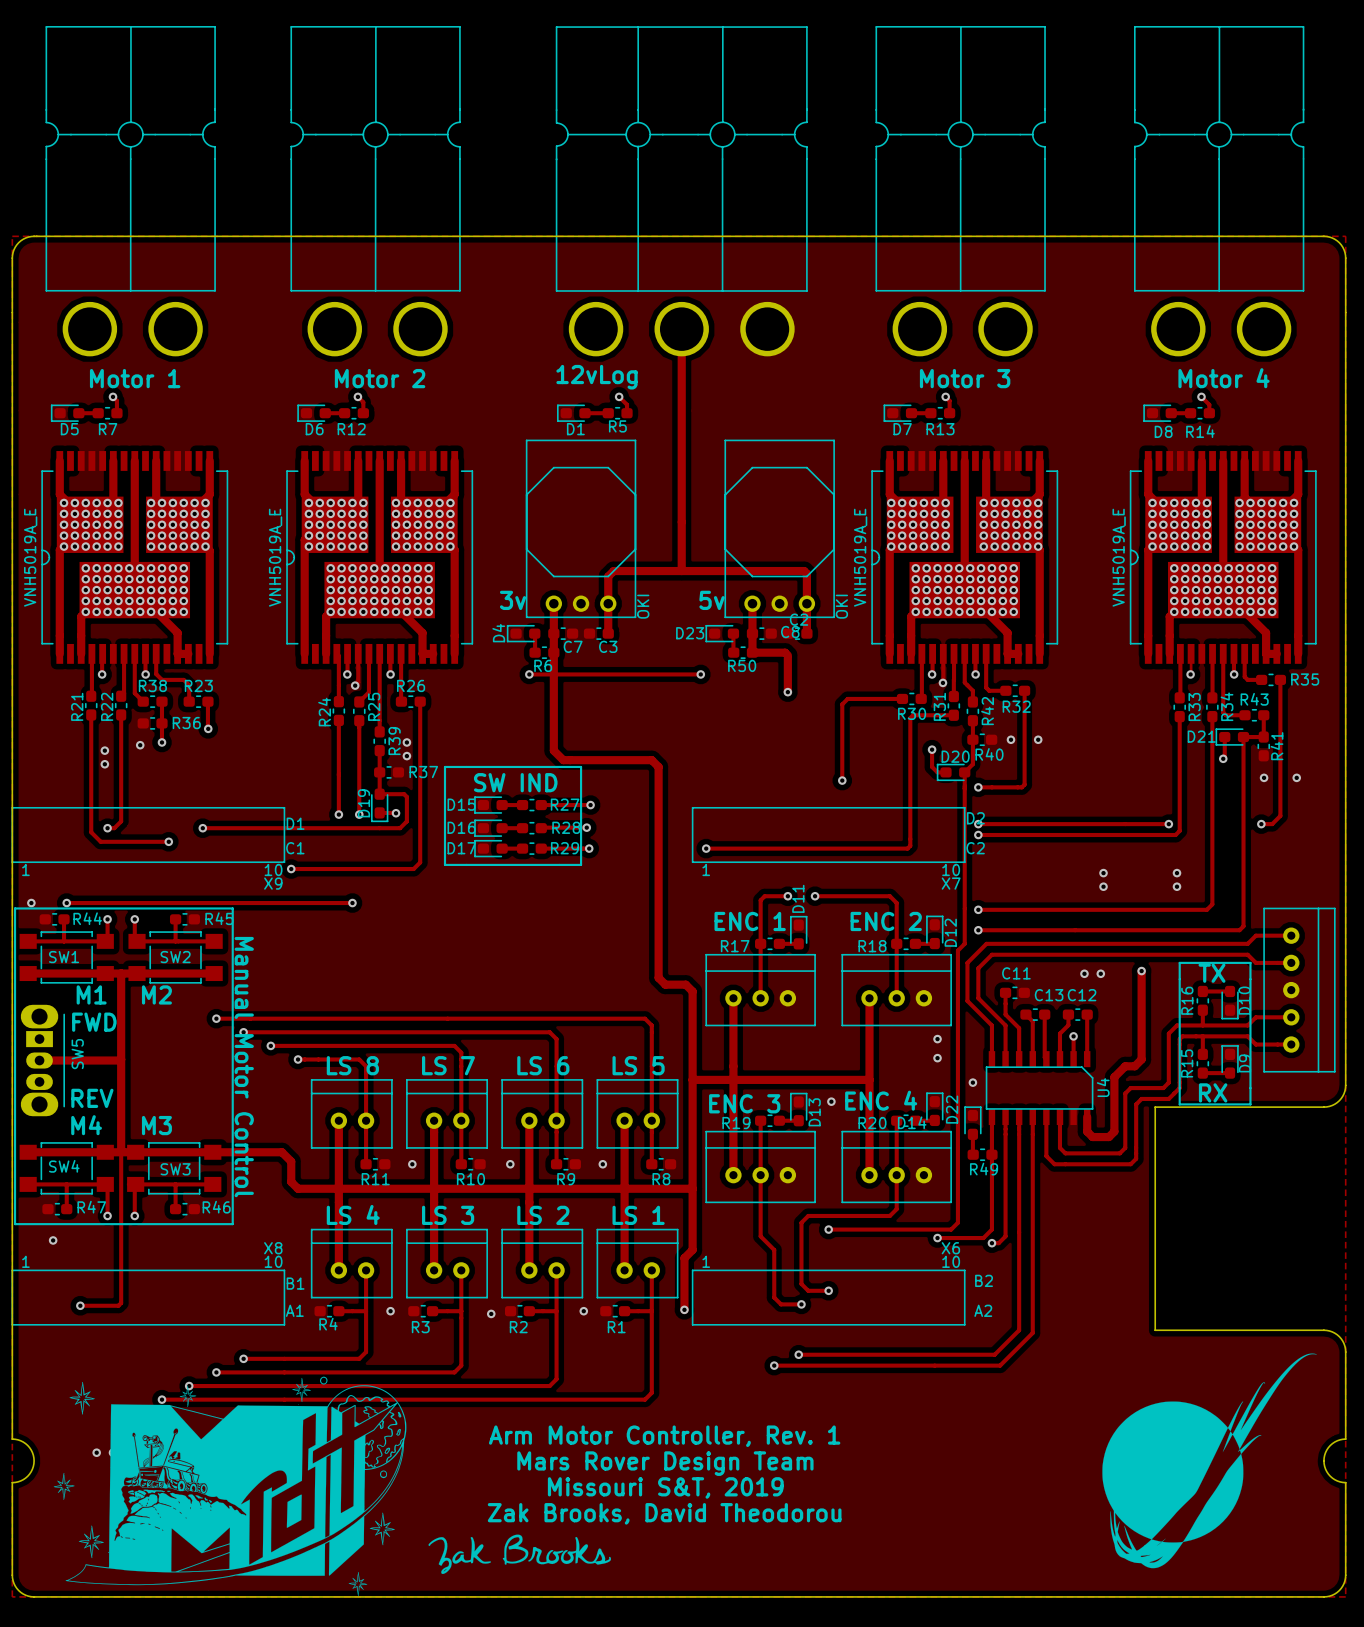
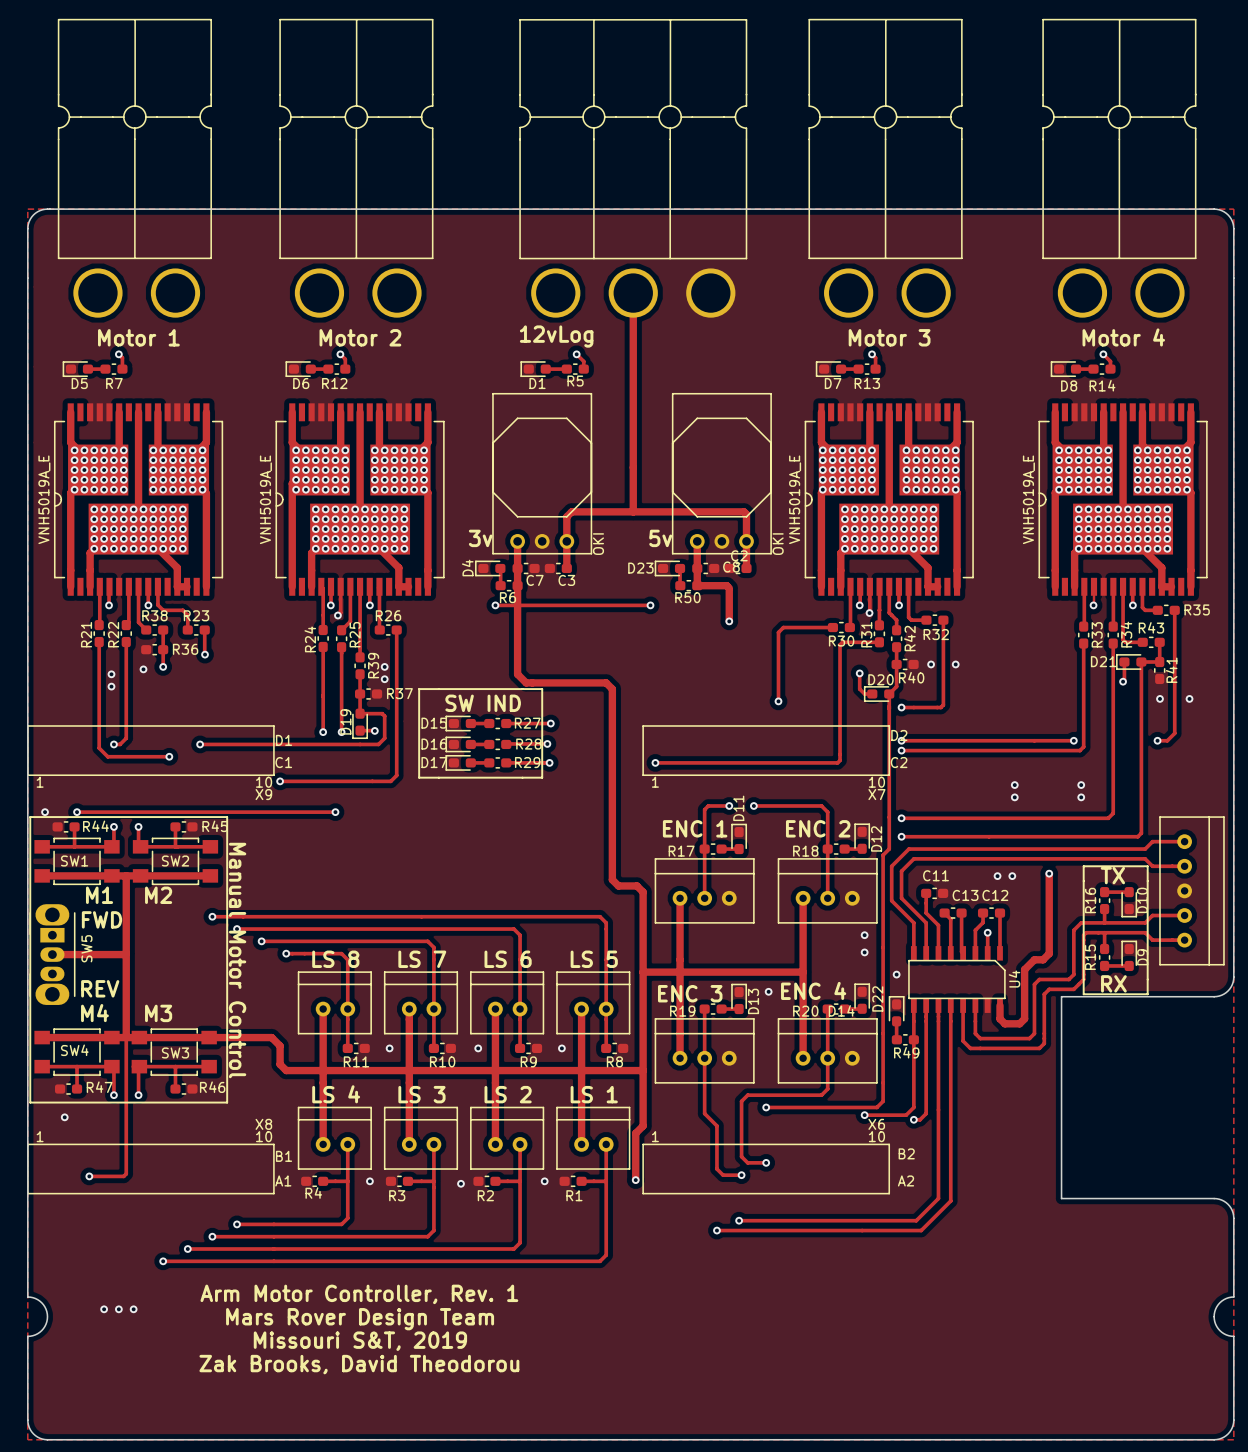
drawing: [1102, 1353, 1317, 1569] -> none
drawing: [53, 1376, 407, 1597] -> none
text: none -> Arm Motor Controller, Rev. 1 (359, 1294)
text: Arm Motor Controller, Rev. 1 (664, 1436) -> none
text: none -> Mars Rover Design Team (360, 1319)
text: Mars Rover Design Team (665, 1463) -> none
text: none -> Missouri S&T, 2019 (360, 1341)
text: Missouri S&T, 2019 (665, 1487) -> none
text: none -> Zak Brooks, David Theodorou (359, 1364)
text: Zak Brooks, David Theodorou (664, 1513) -> none
drawing: [428, 1534, 612, 1575] -> none

